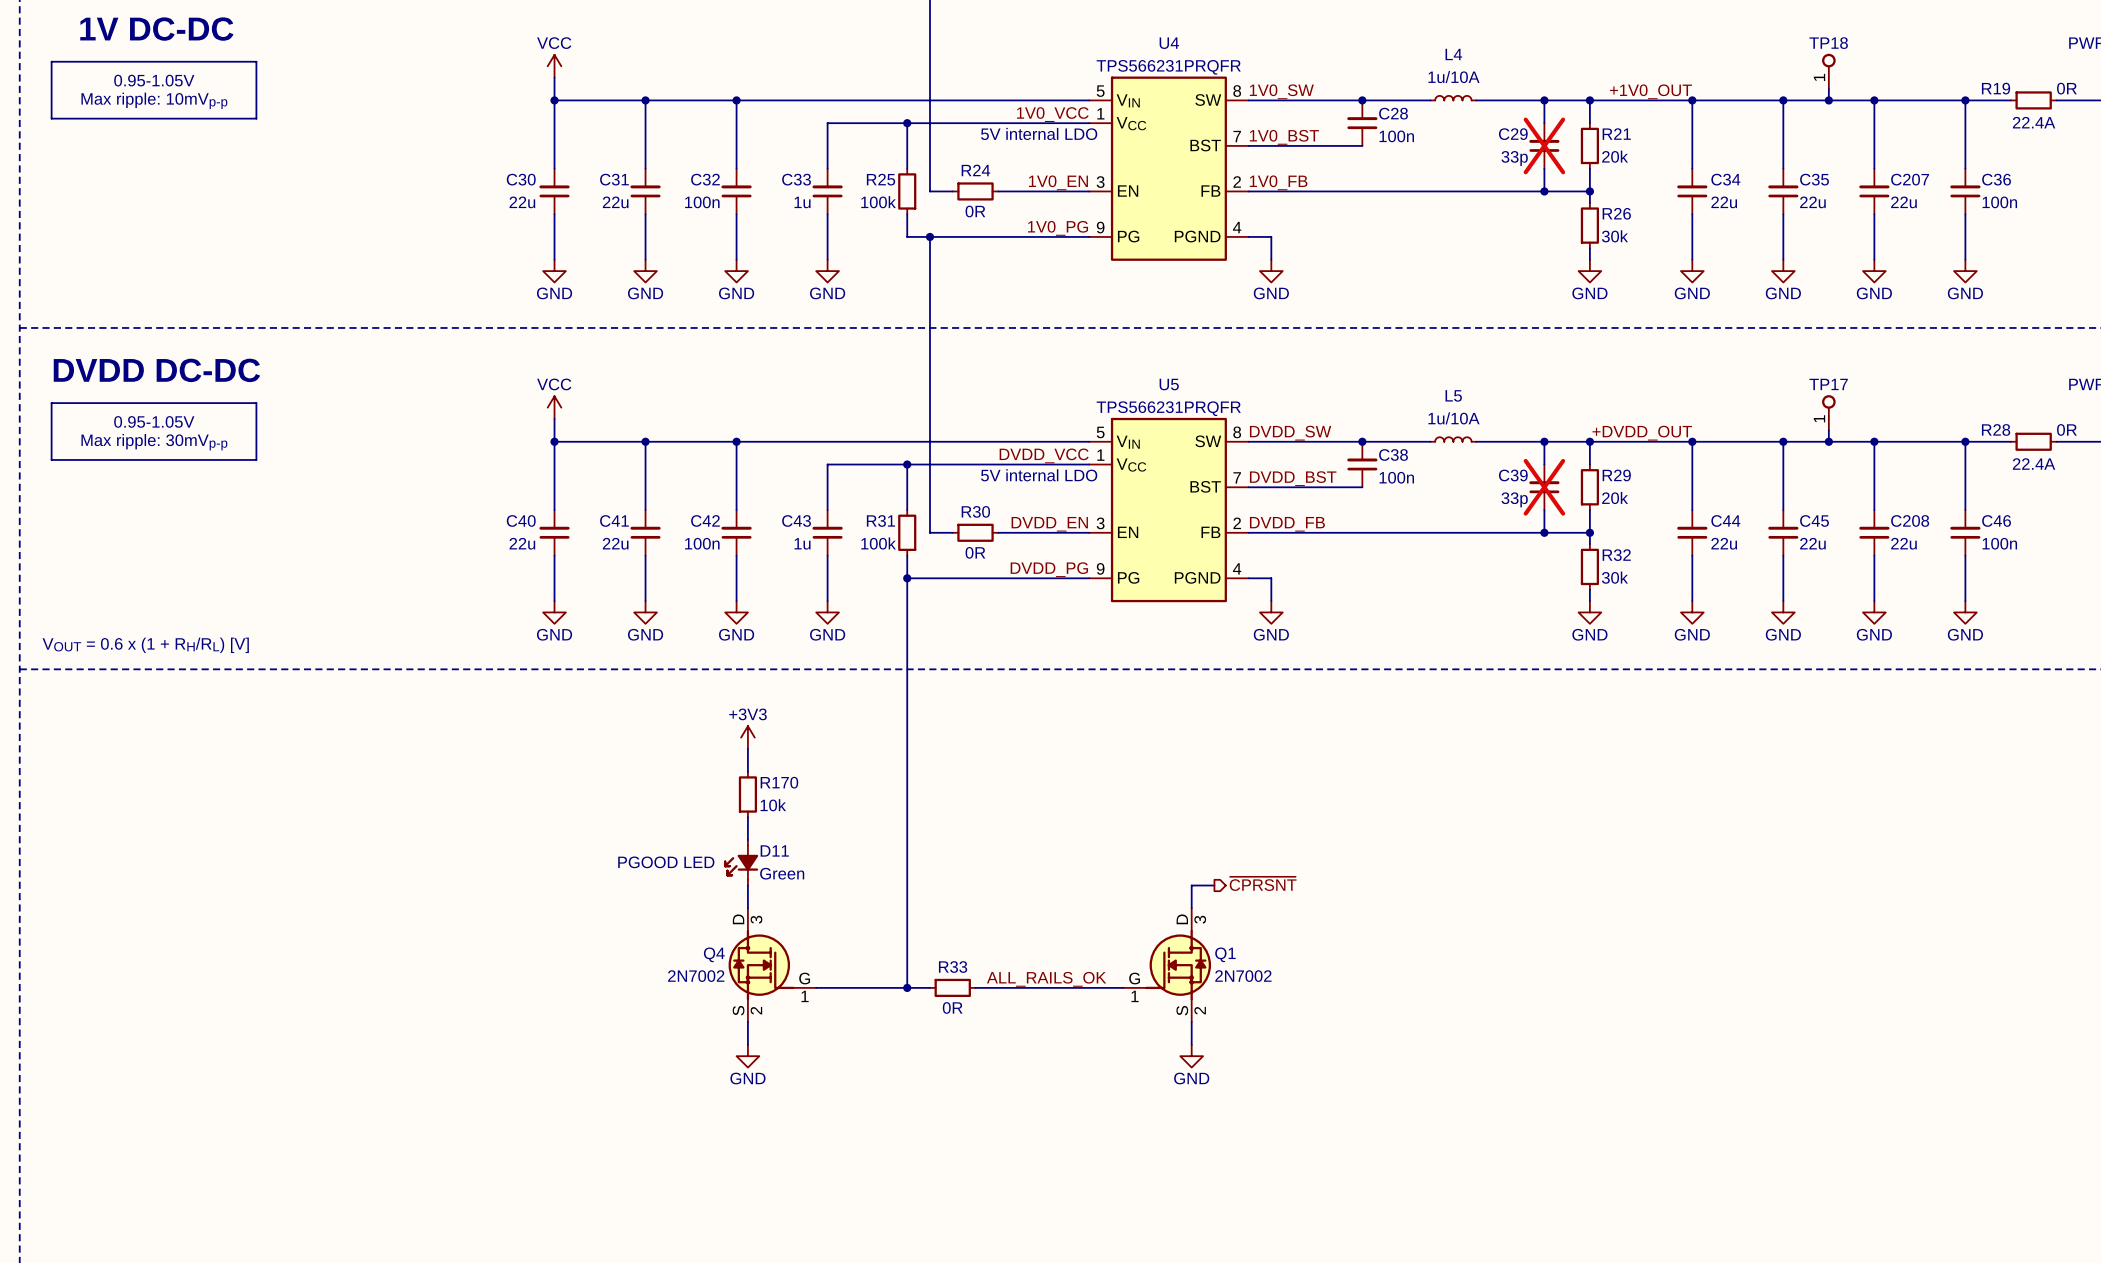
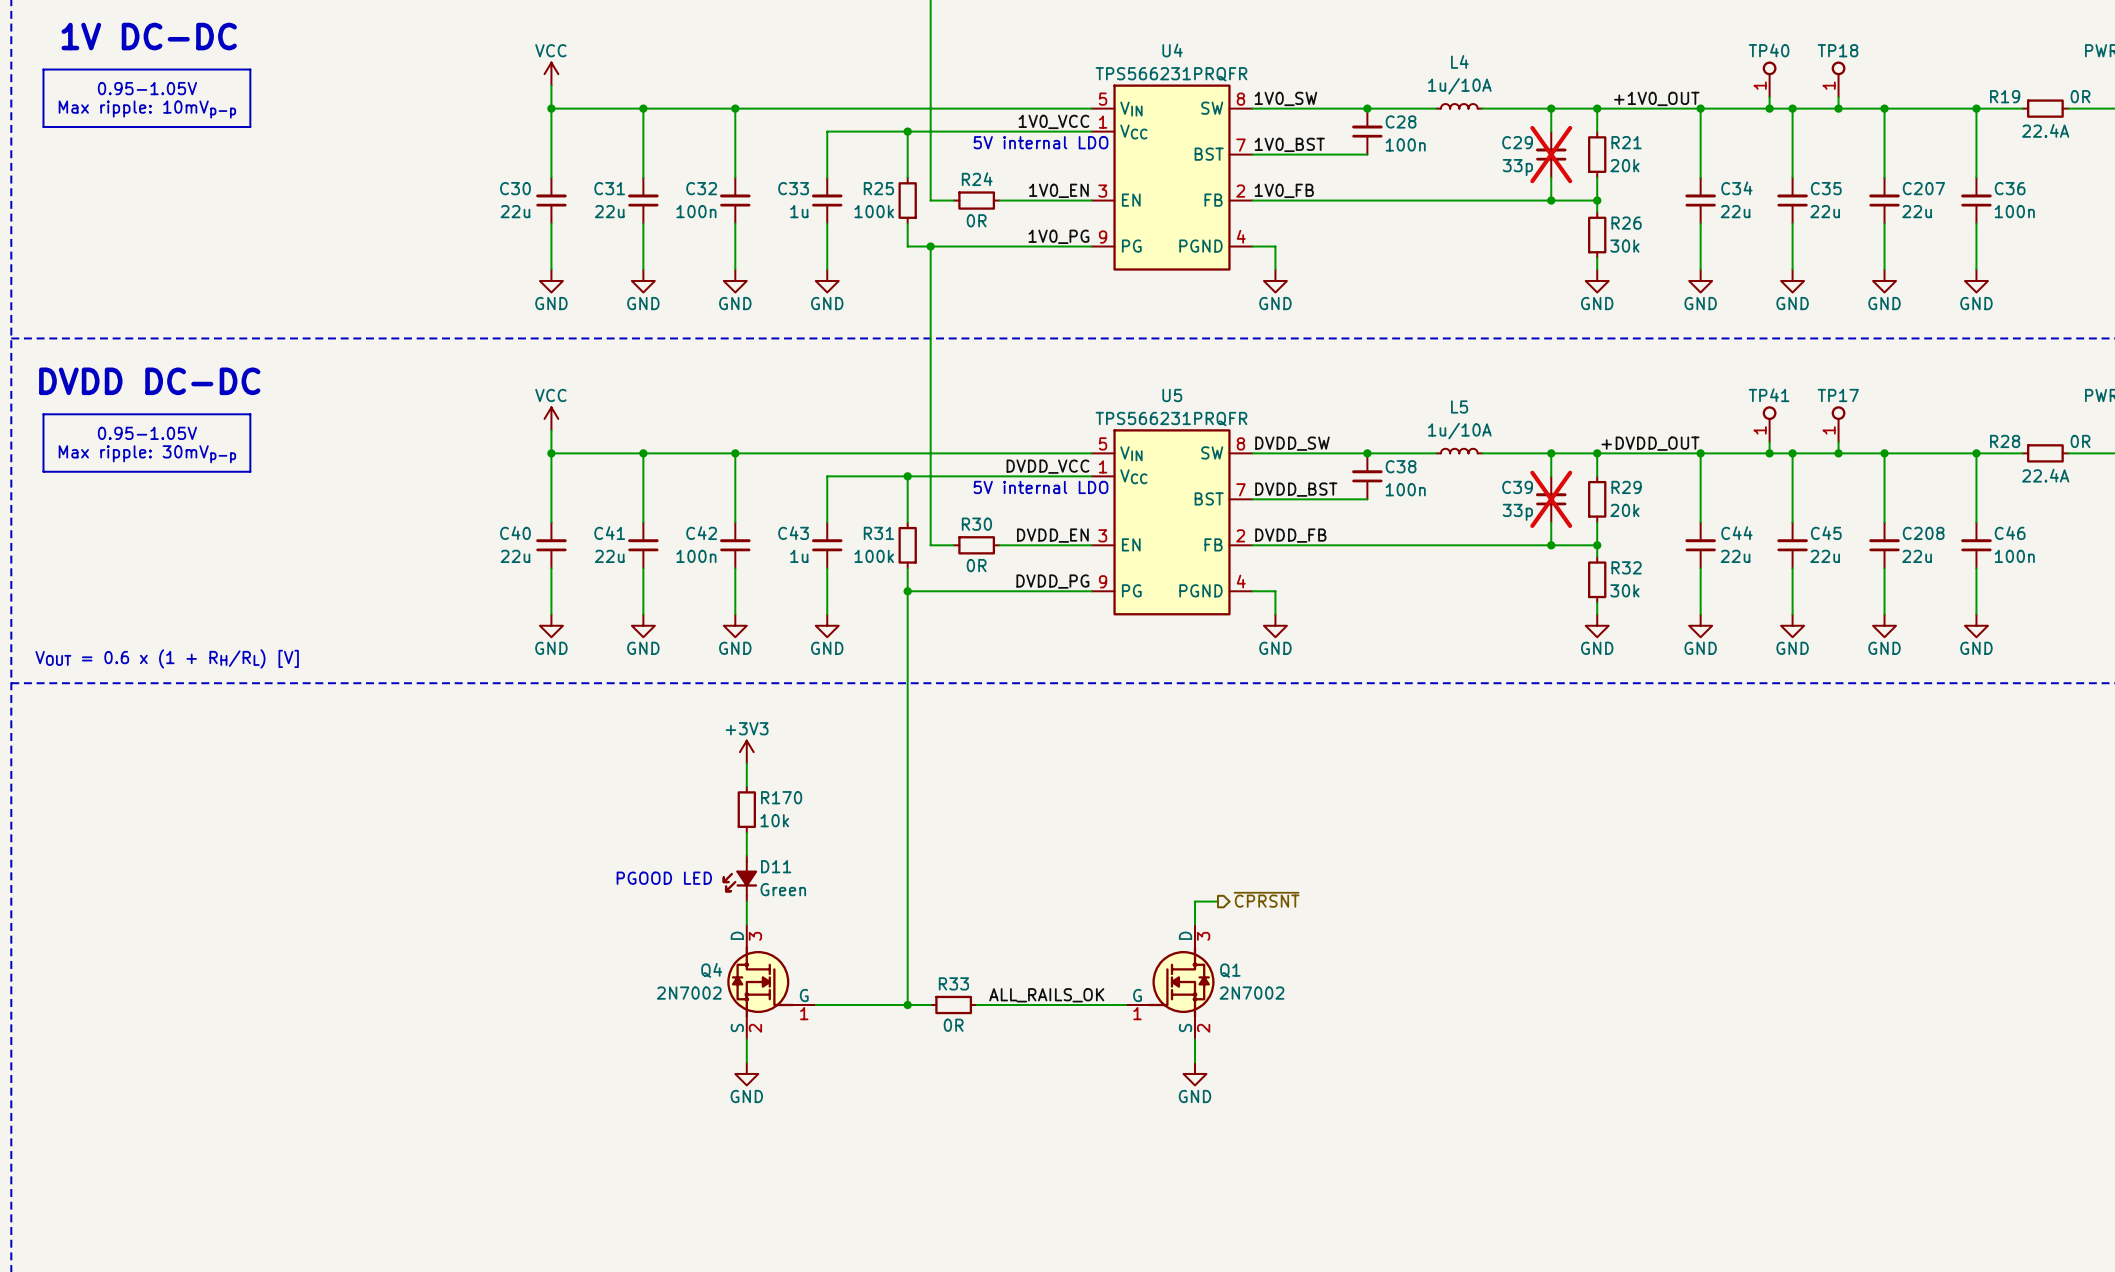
TP40: none -> (1769, 79)
wire: none -> (1769, 97) (1769, 108)
junction: none -> (1769, 108)
TP41: none -> (1769, 424)
wire: none -> (1769, 441) (1769, 453)
junction: none -> (1769, 453)

